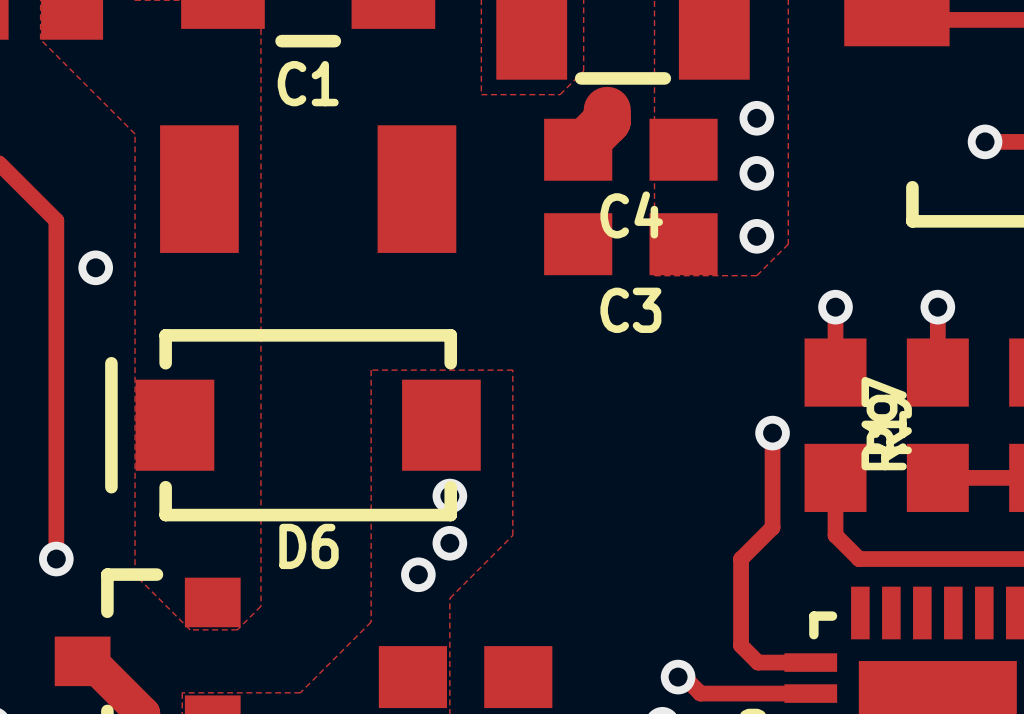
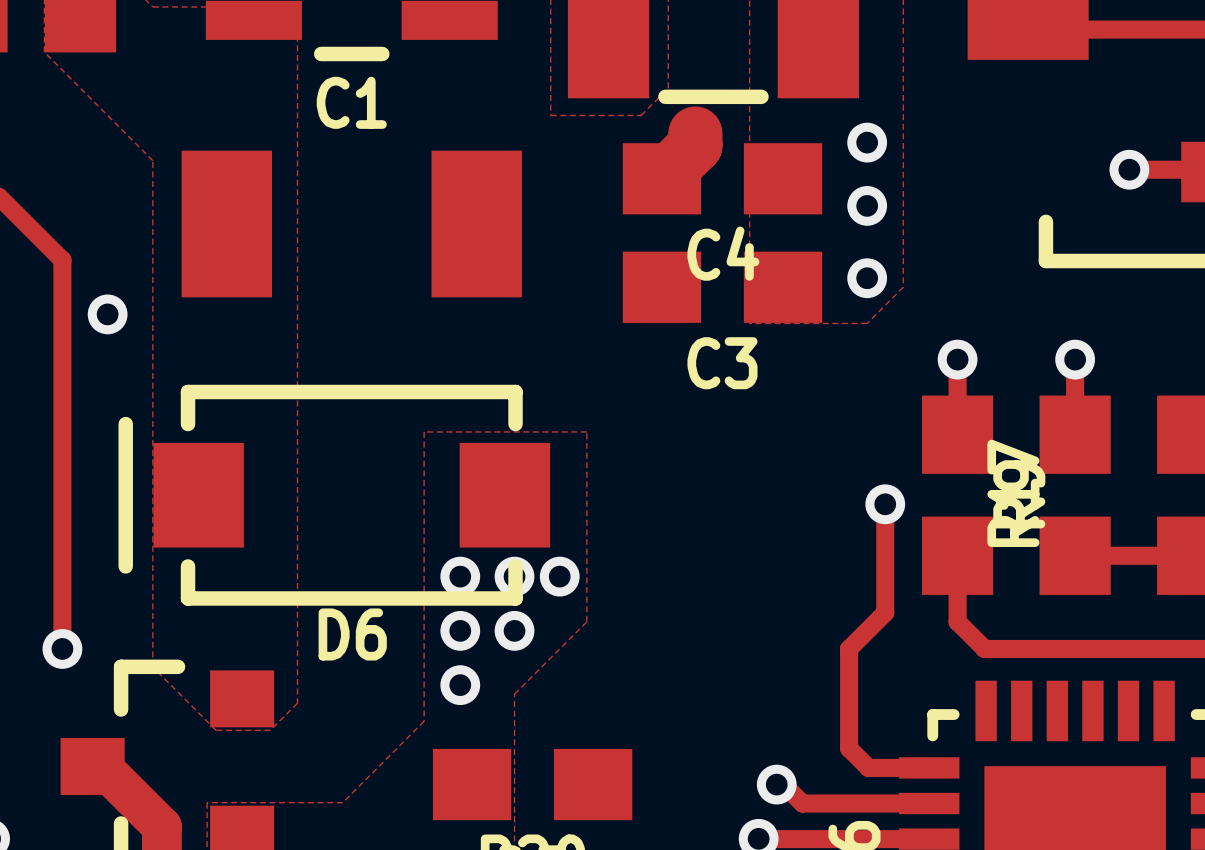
via: none -> (460, 576)
via: none -> (559, 576)
via: none -> (460, 630)
via: (418, 574) -> none
via: none -> (460, 685)

